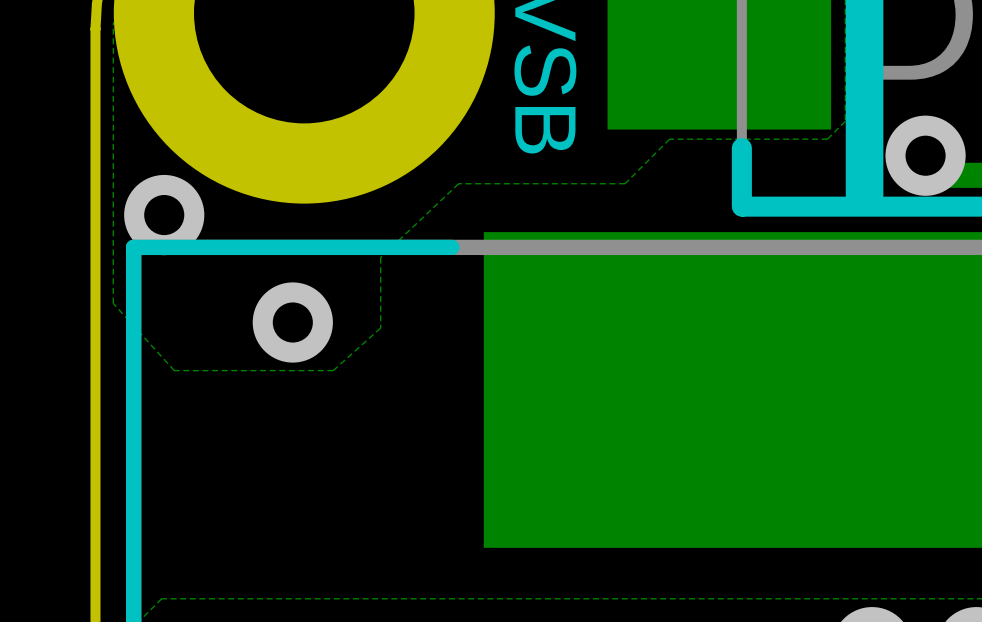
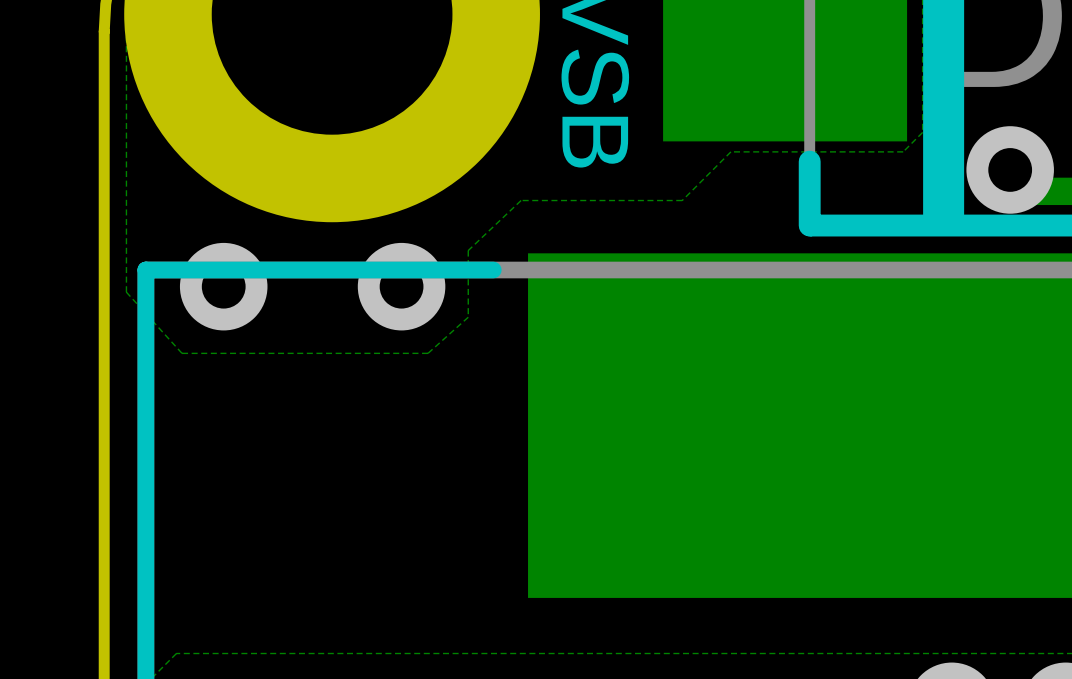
zone outline: (115, 20) (113, 23) (113, 303) (174, 370) (333, 370) (380, 328) (380, 257) (458, 183) (477, 183) -> (126, 22) (126, 292) (182, 353) (428, 353) (468, 317) (468, 250) (521, 200)
via position: (164, 215) -> (223, 286)
via position: (292, 322) -> (401, 286)

